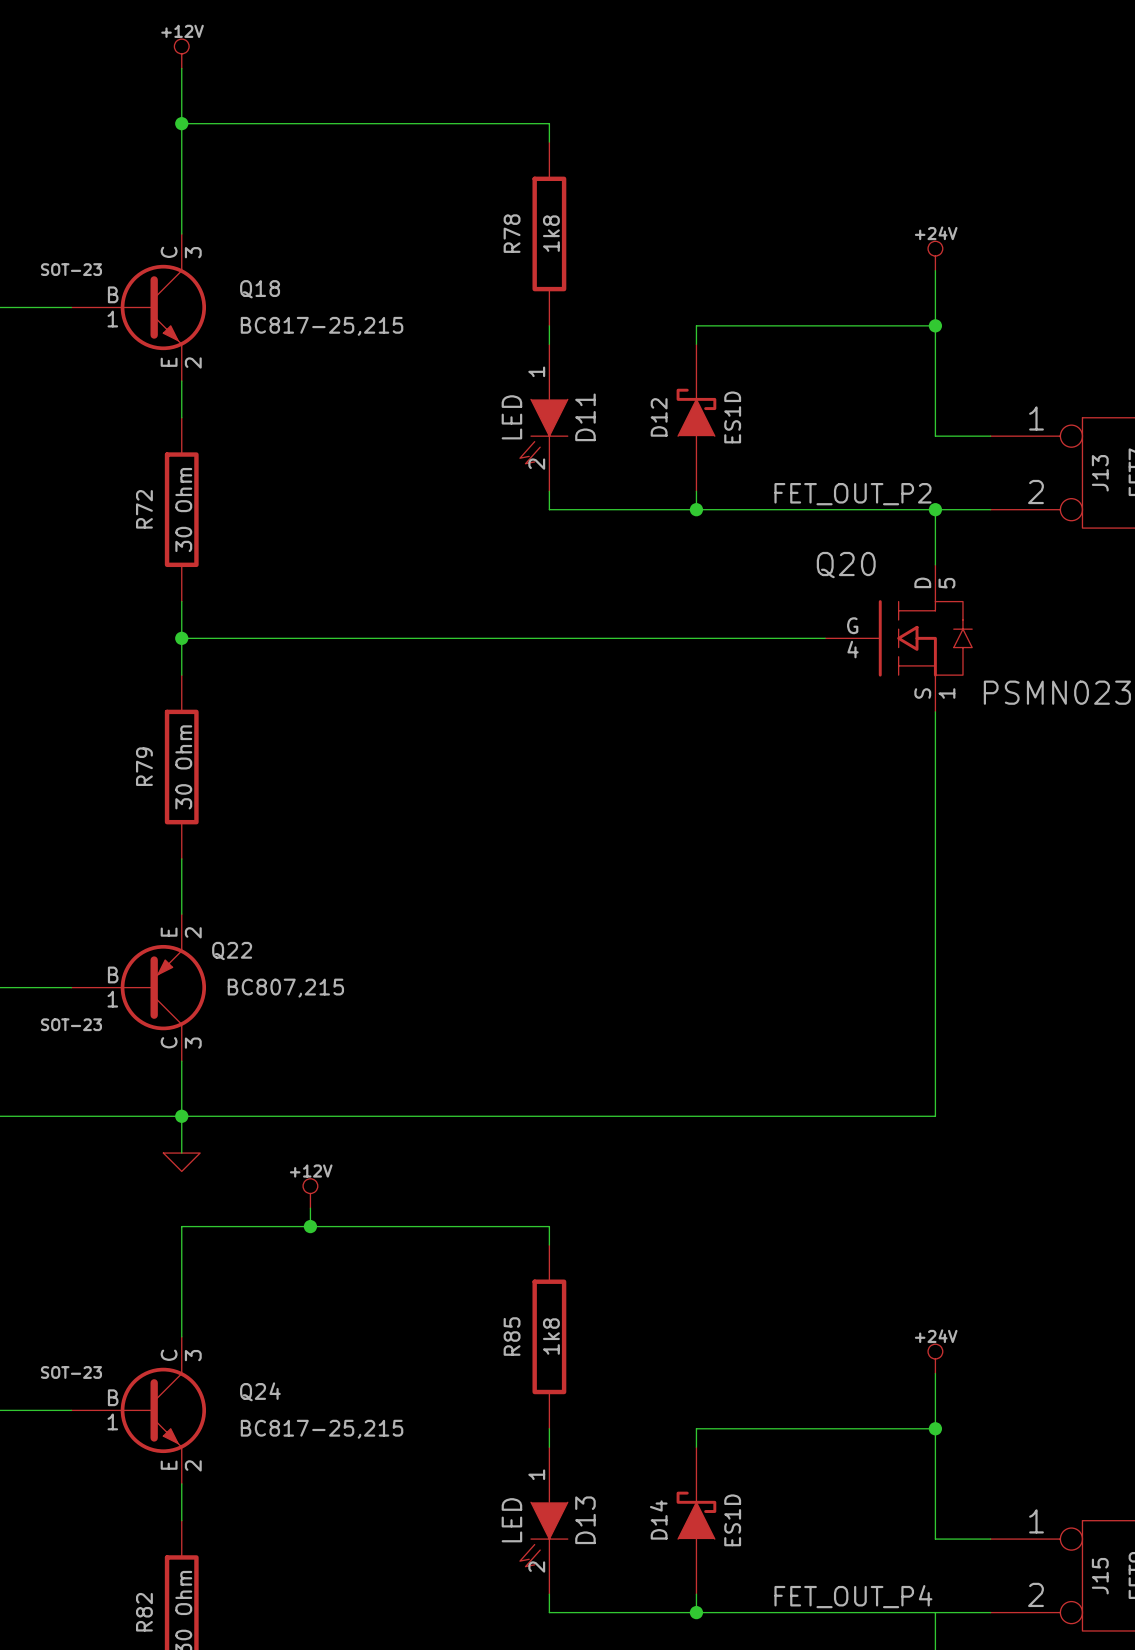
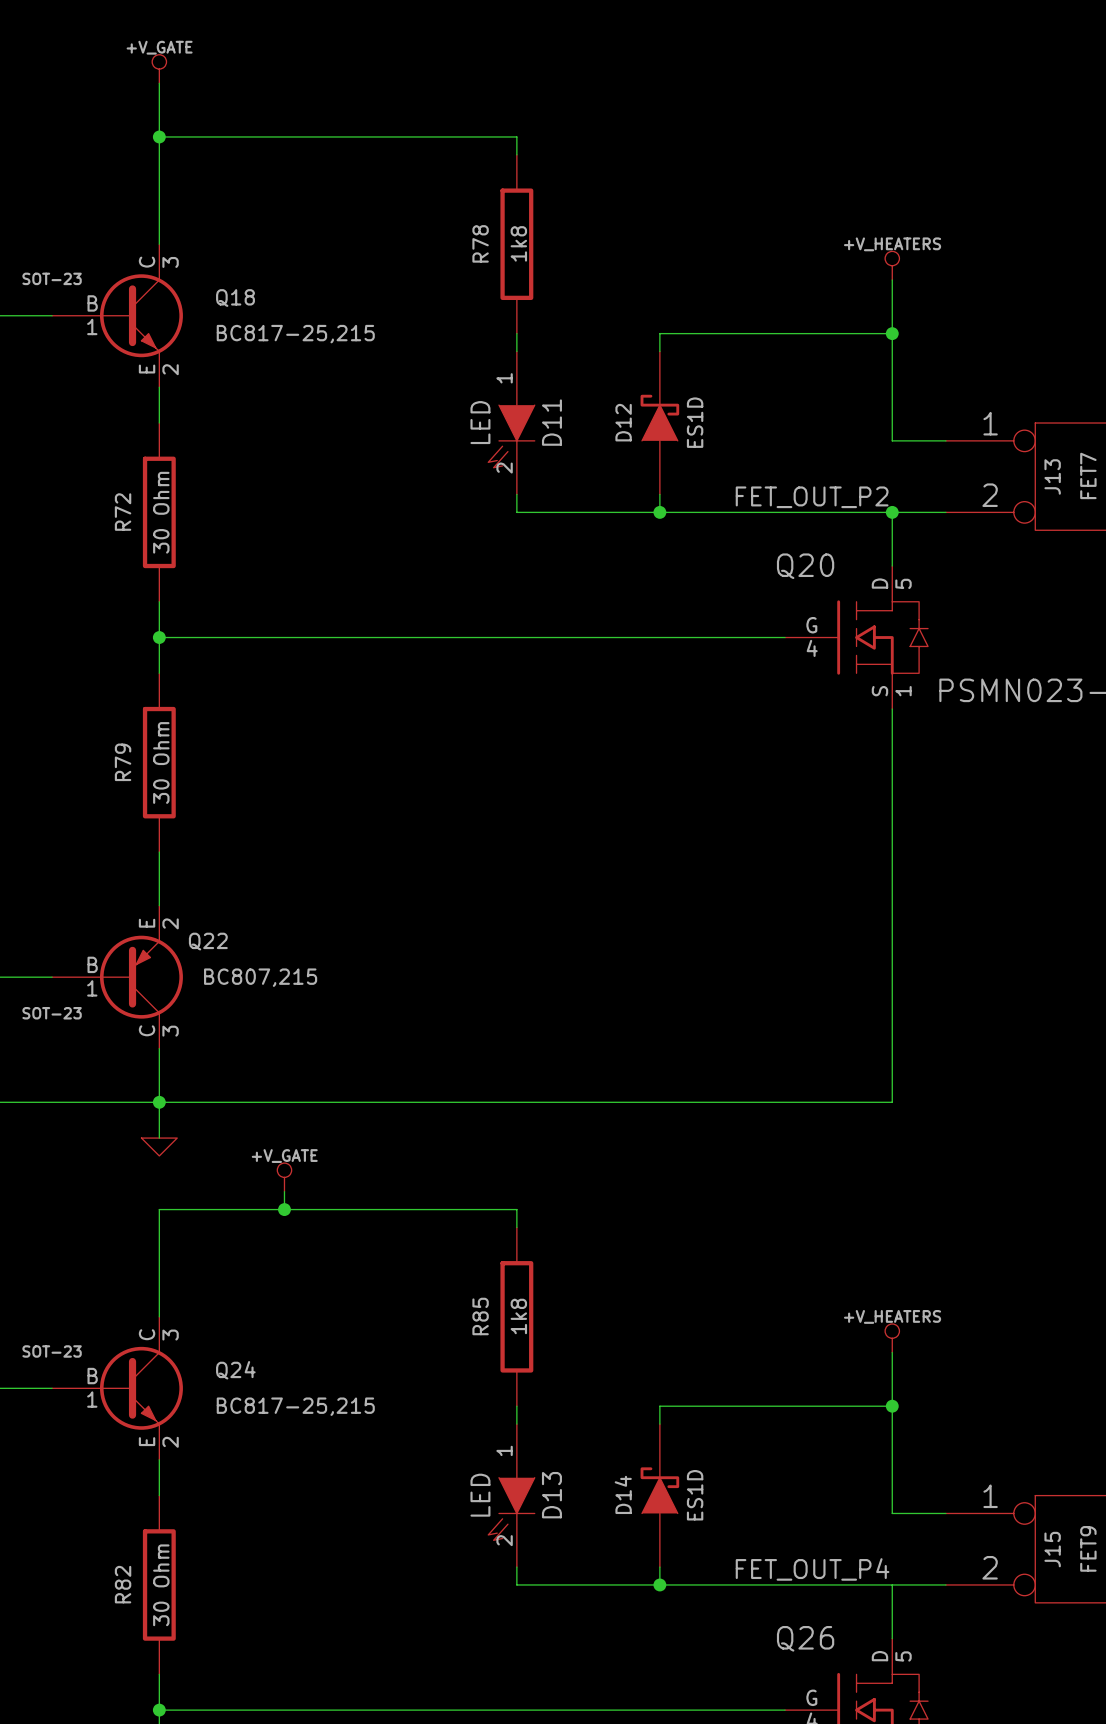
power symbol: +12V (181, 53) -> +V_GATE (159, 69)
power symbol: +24V (935, 256) -> +V_HEATERS (892, 265)
power symbol: +12V (310, 1193) -> +V_GATE (284, 1177)
power symbol: +24V (935, 1358) -> +V_HEATERS (892, 1338)

